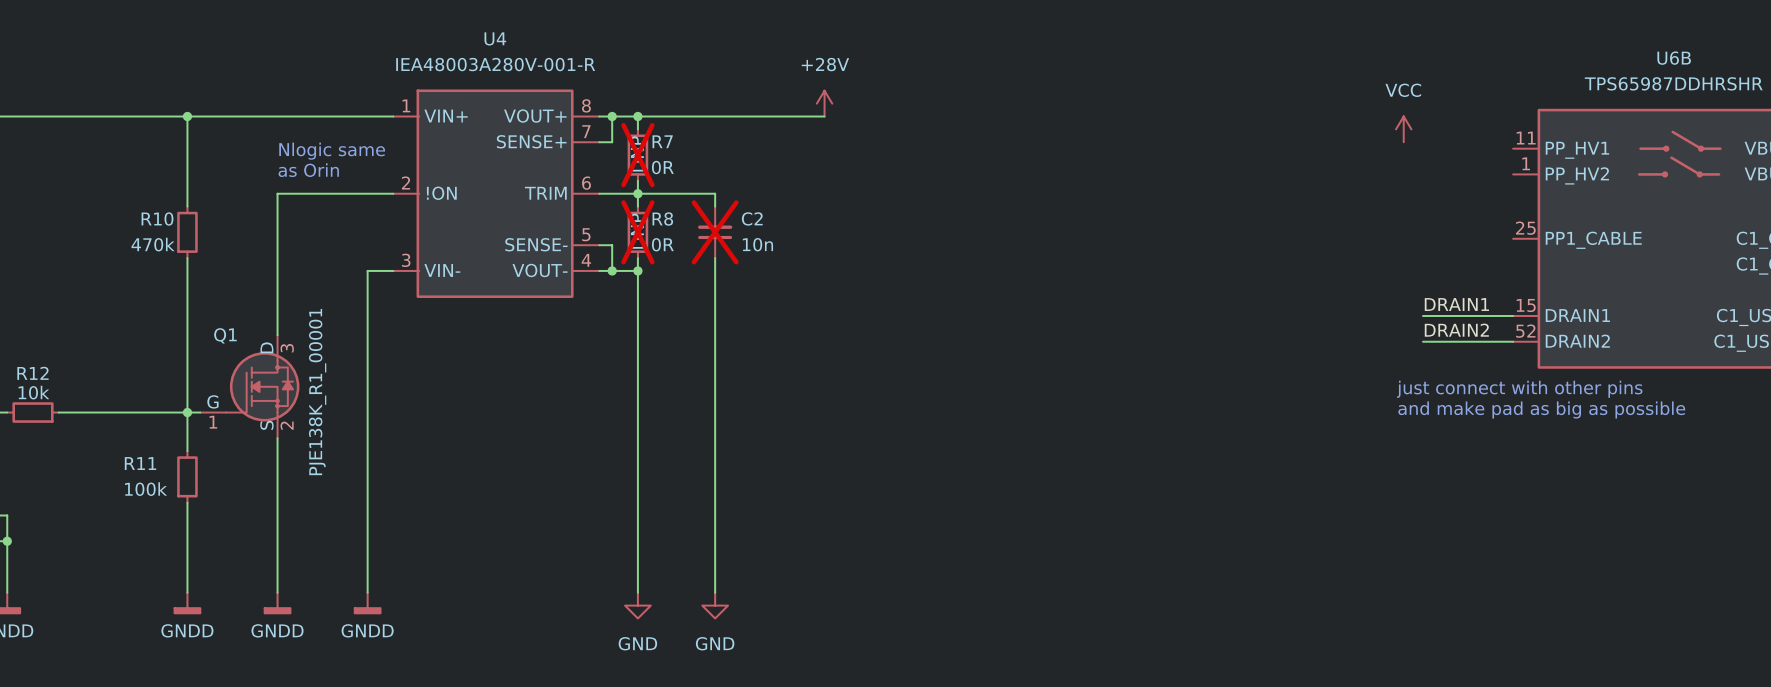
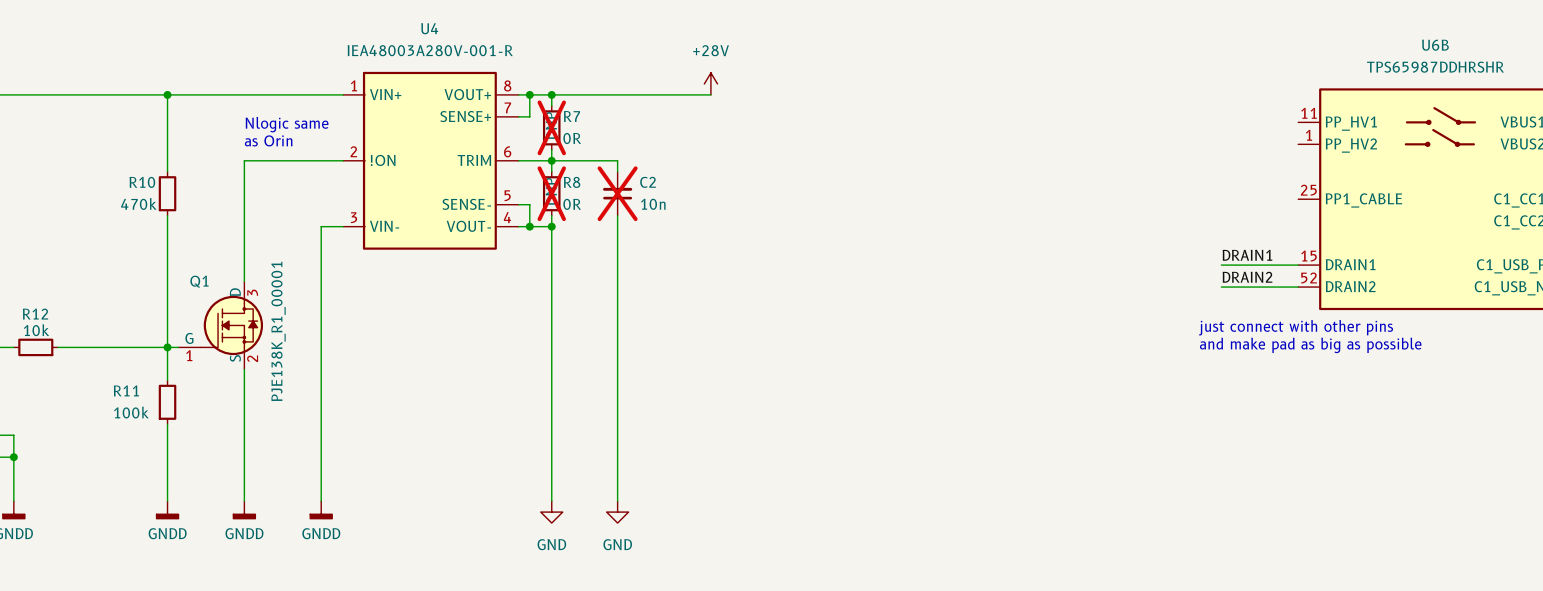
power symbol: VCC (1403, 129) -> none

